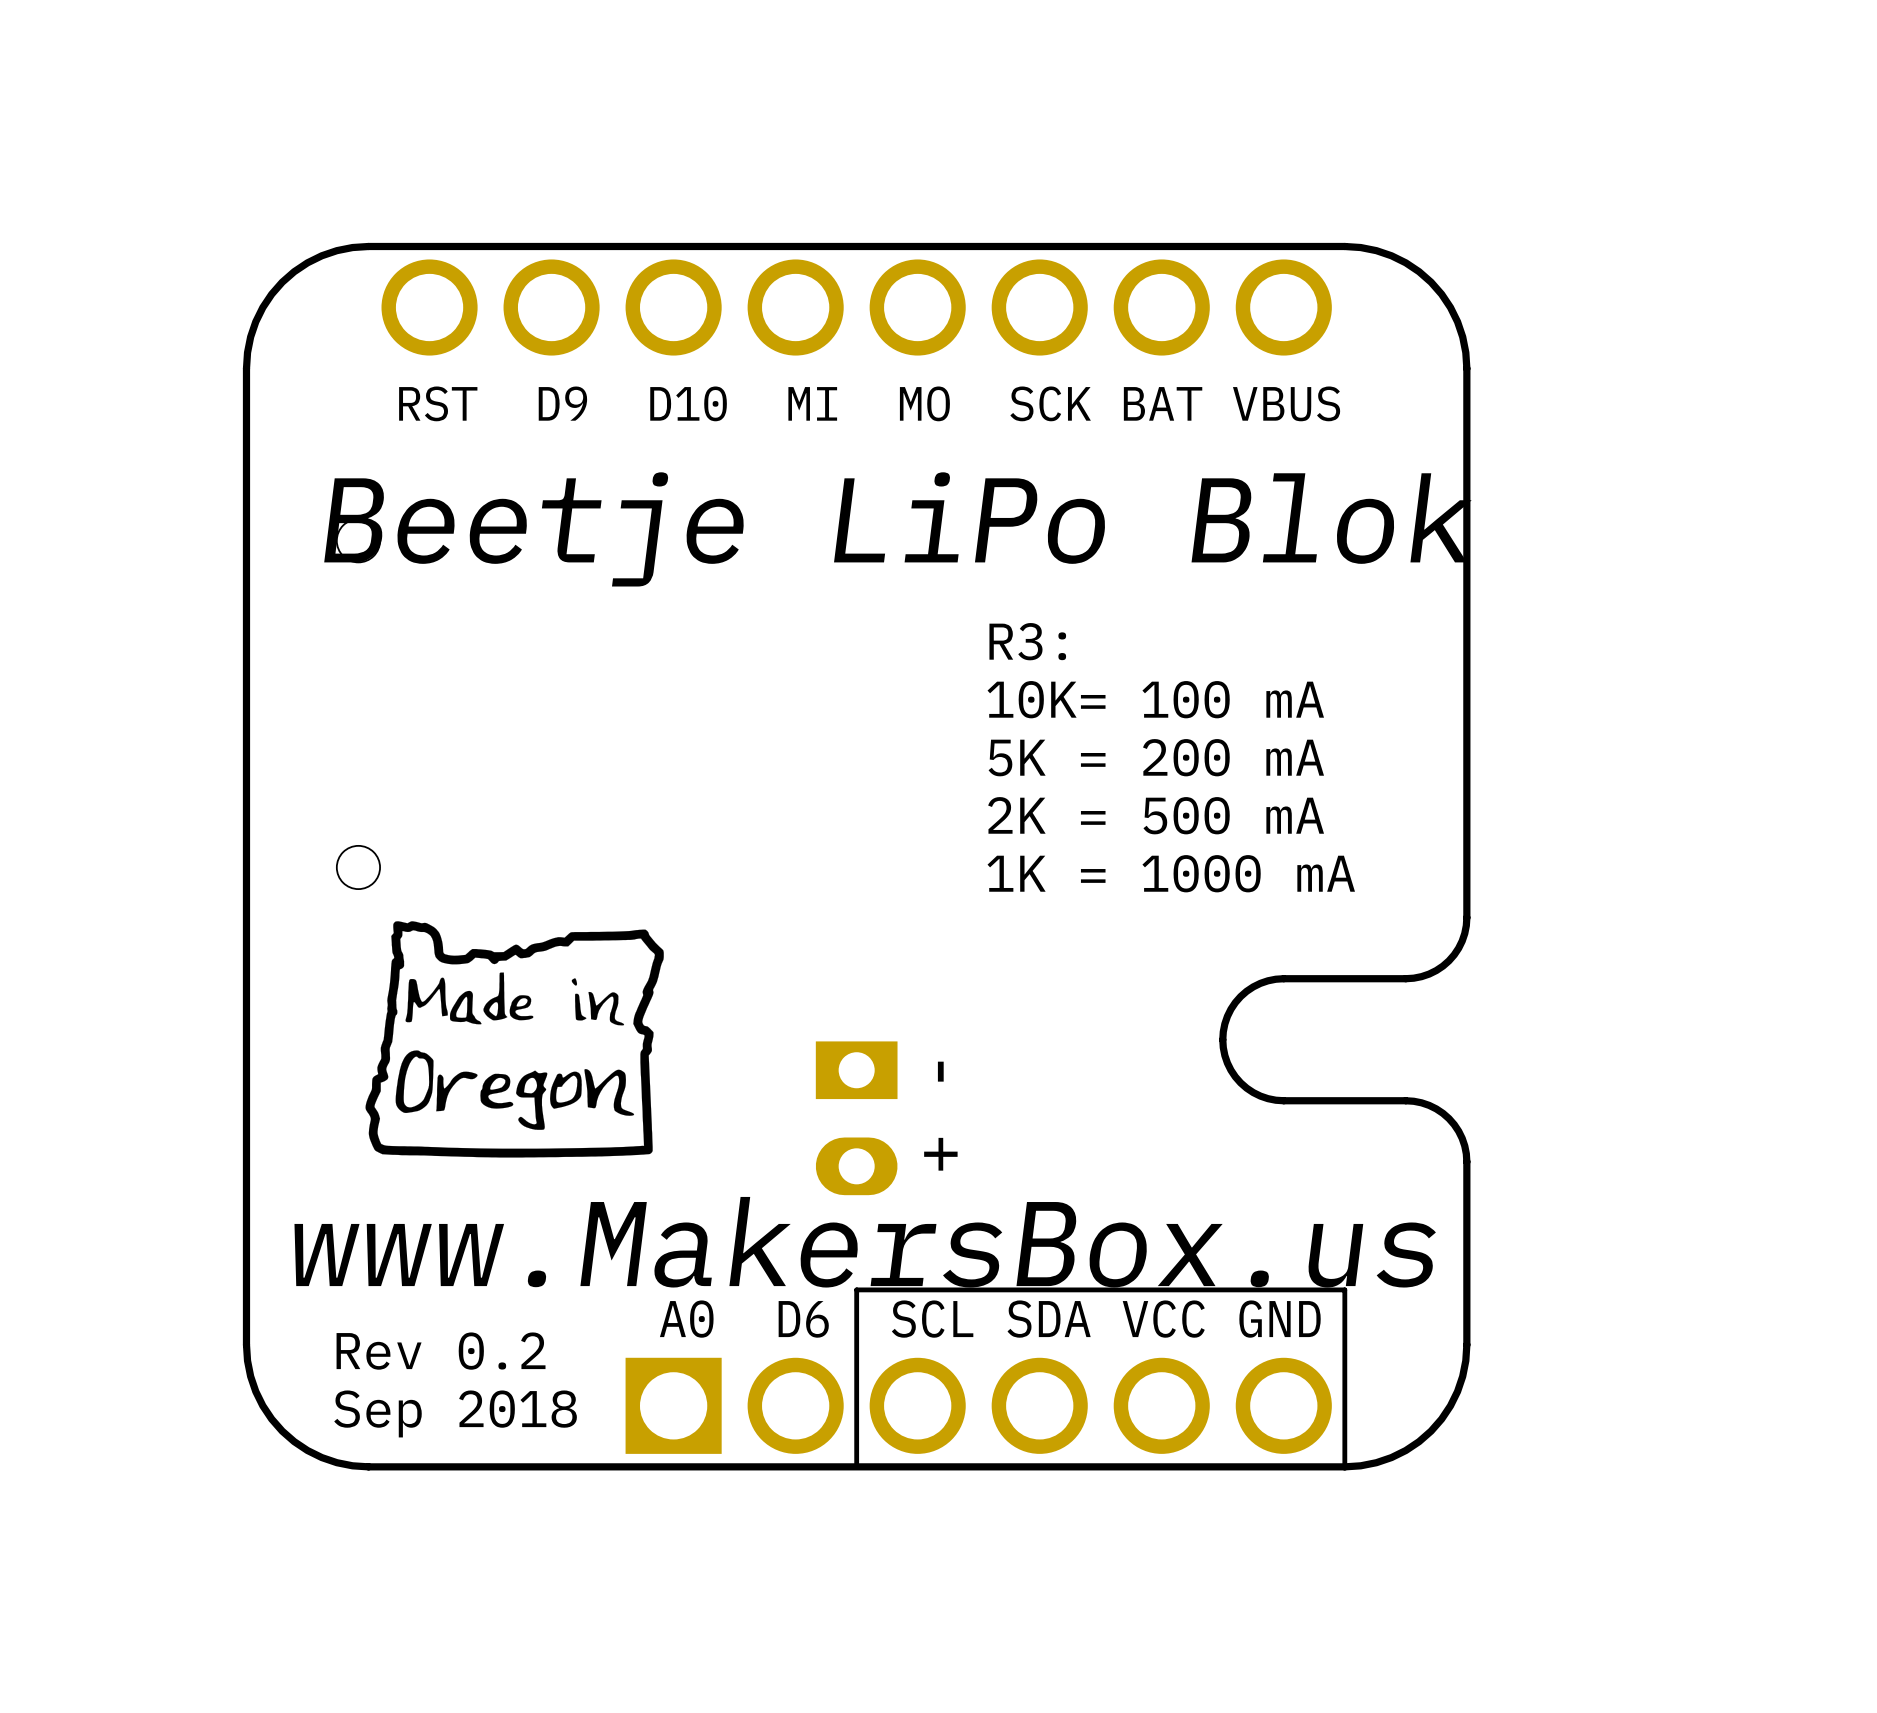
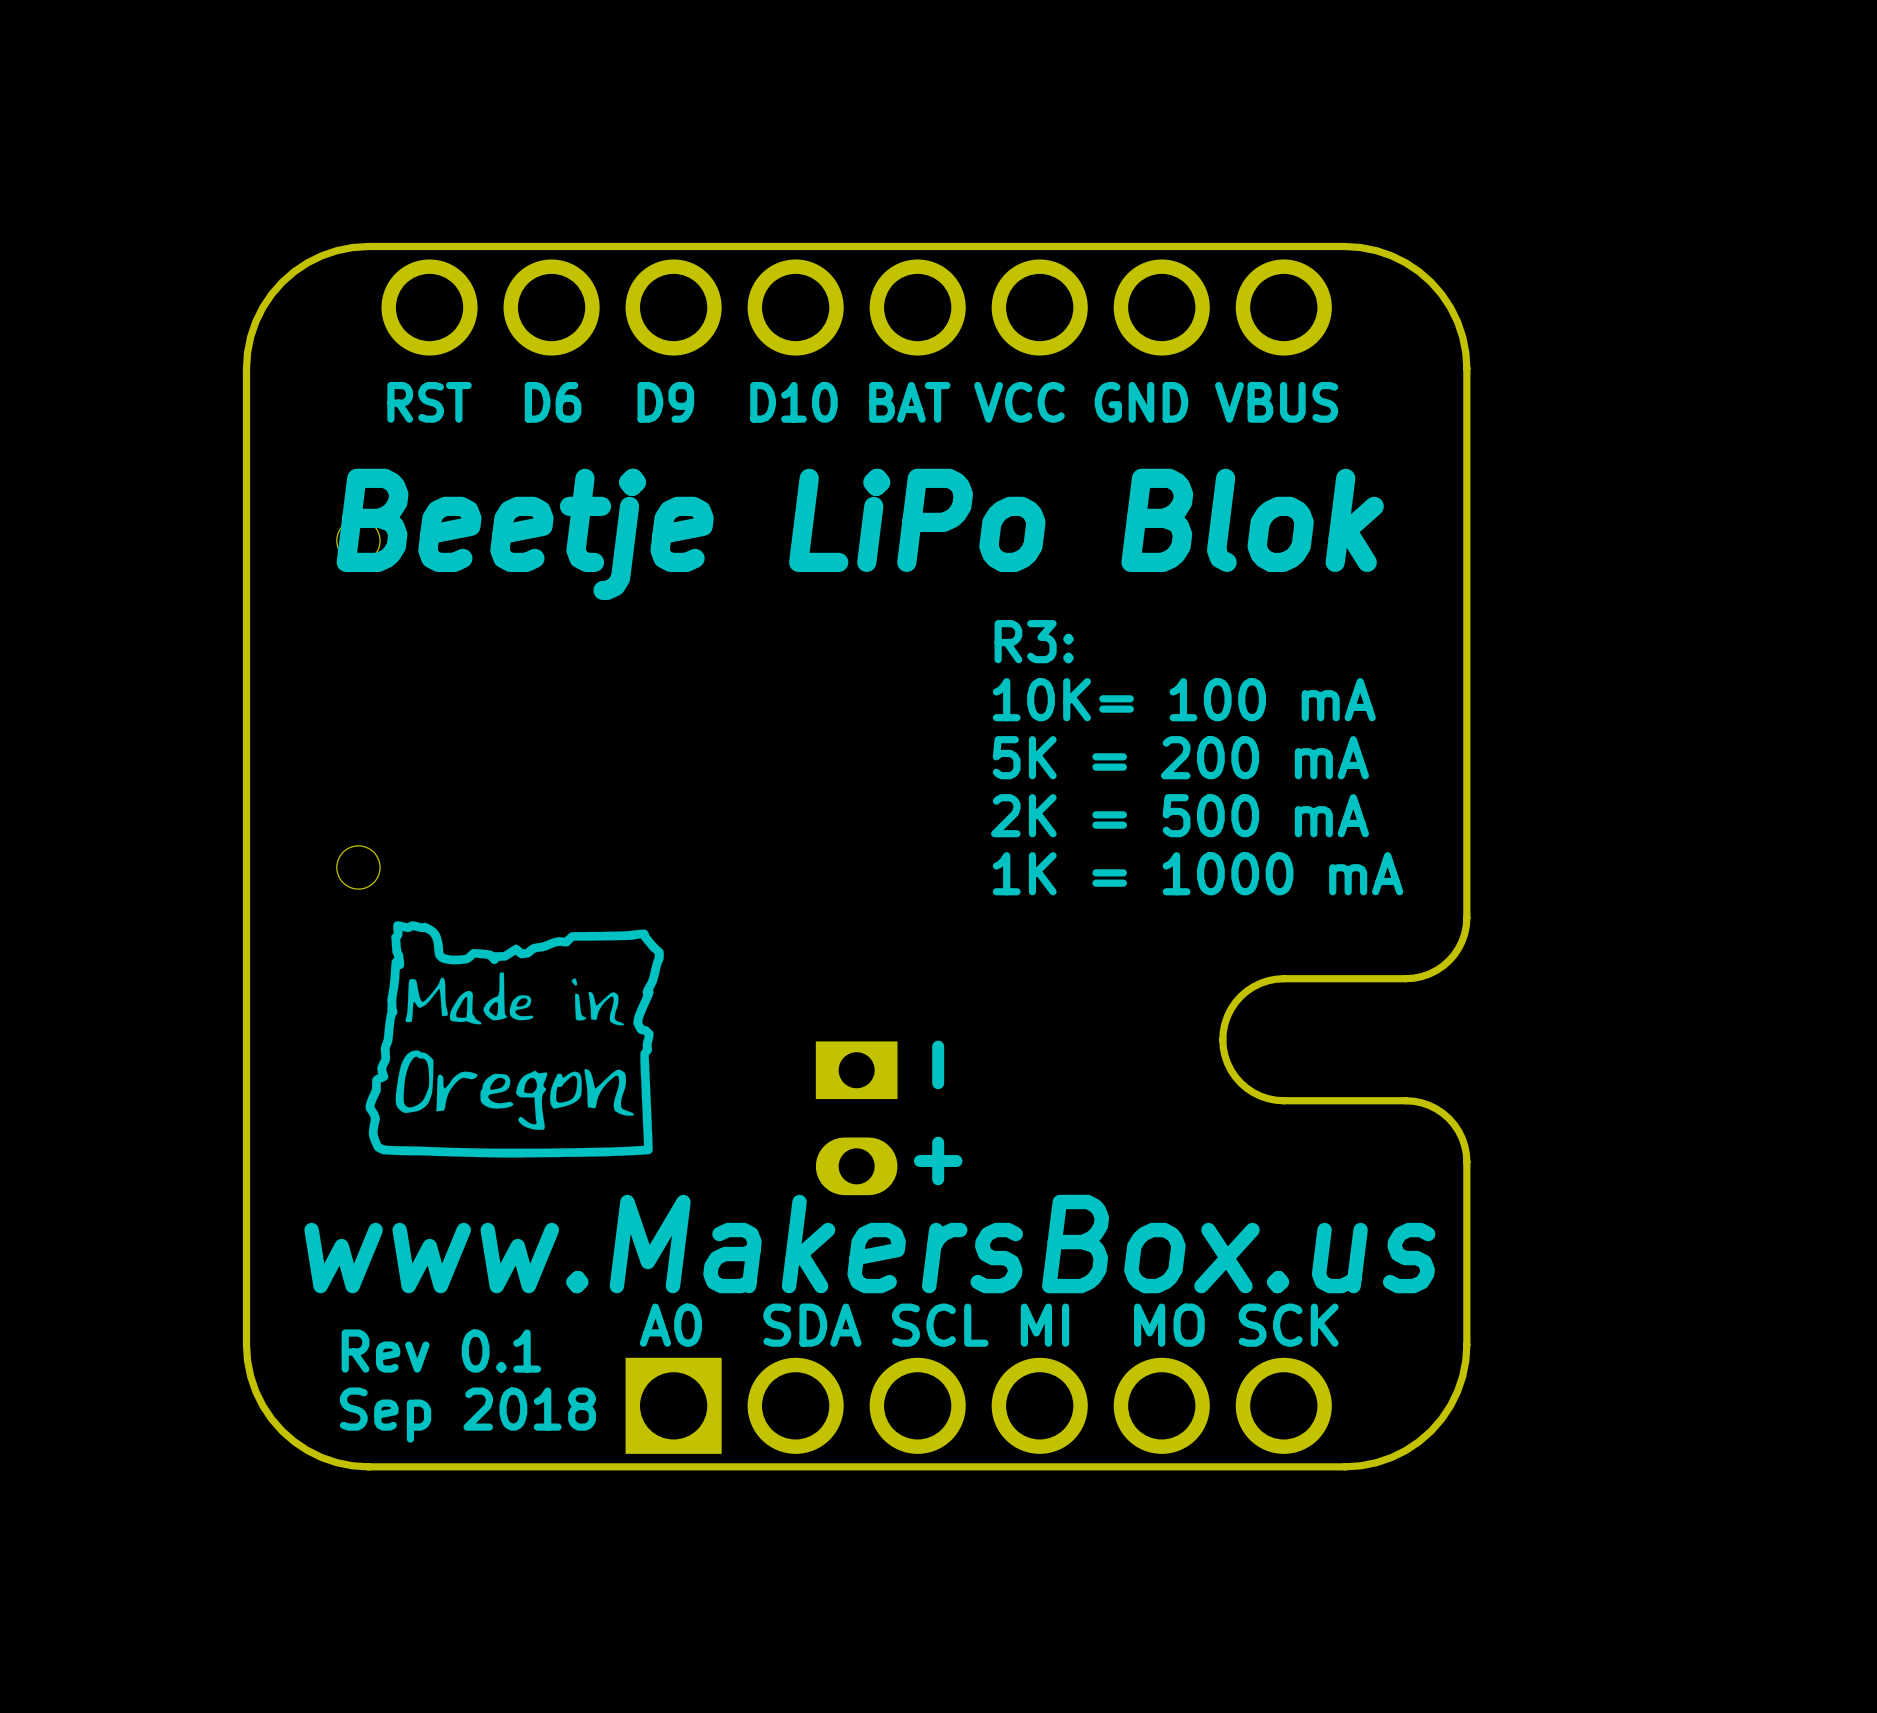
part text: none -> RST D6 D9 D10 BAT VCC GND VBUS (862, 402)
part text: RST D9 D10 MI MO SCK BAT VBUS (869, 403) -> none
part footprint: [625, 1287, 1348, 1470] -> [625, 1357, 1332, 1454]
text: Rev 0.2 (441, 1351) -> Rev 0.1 (441, 1351)

